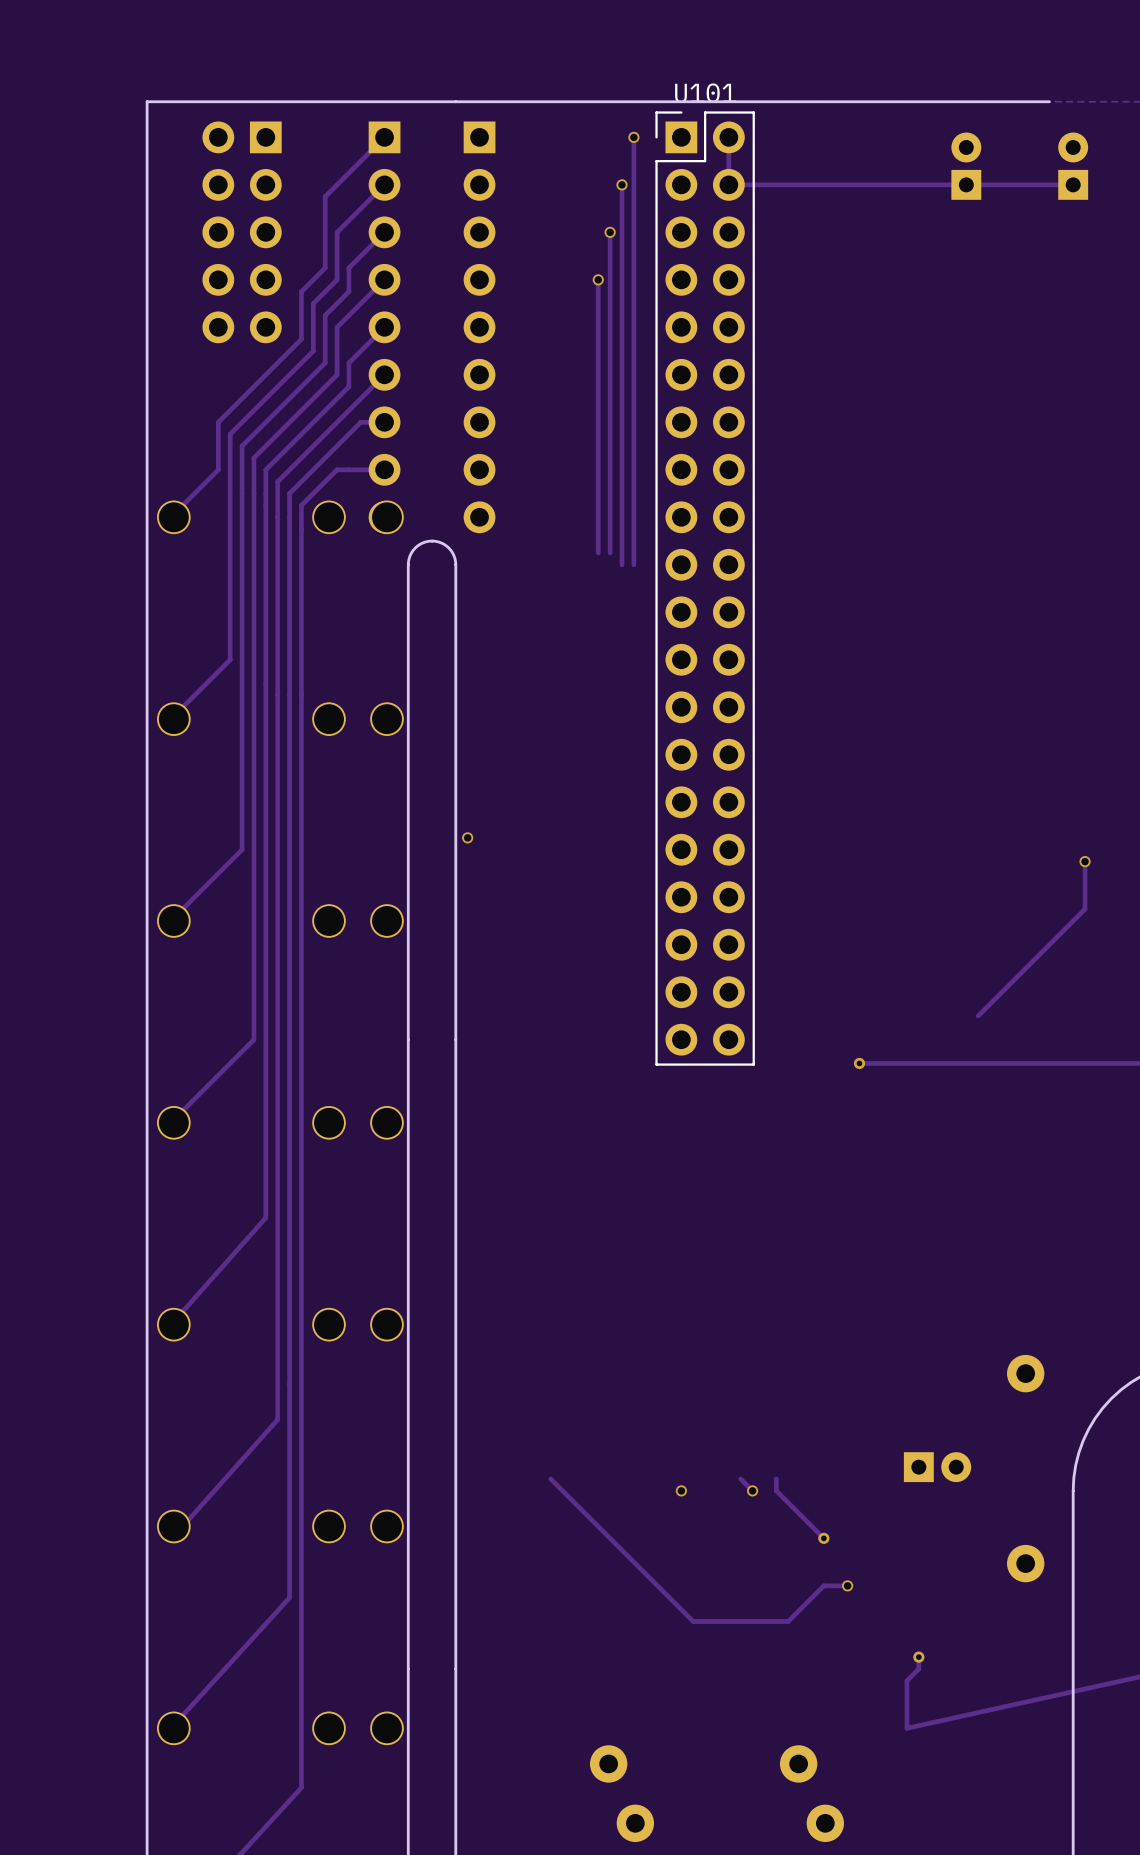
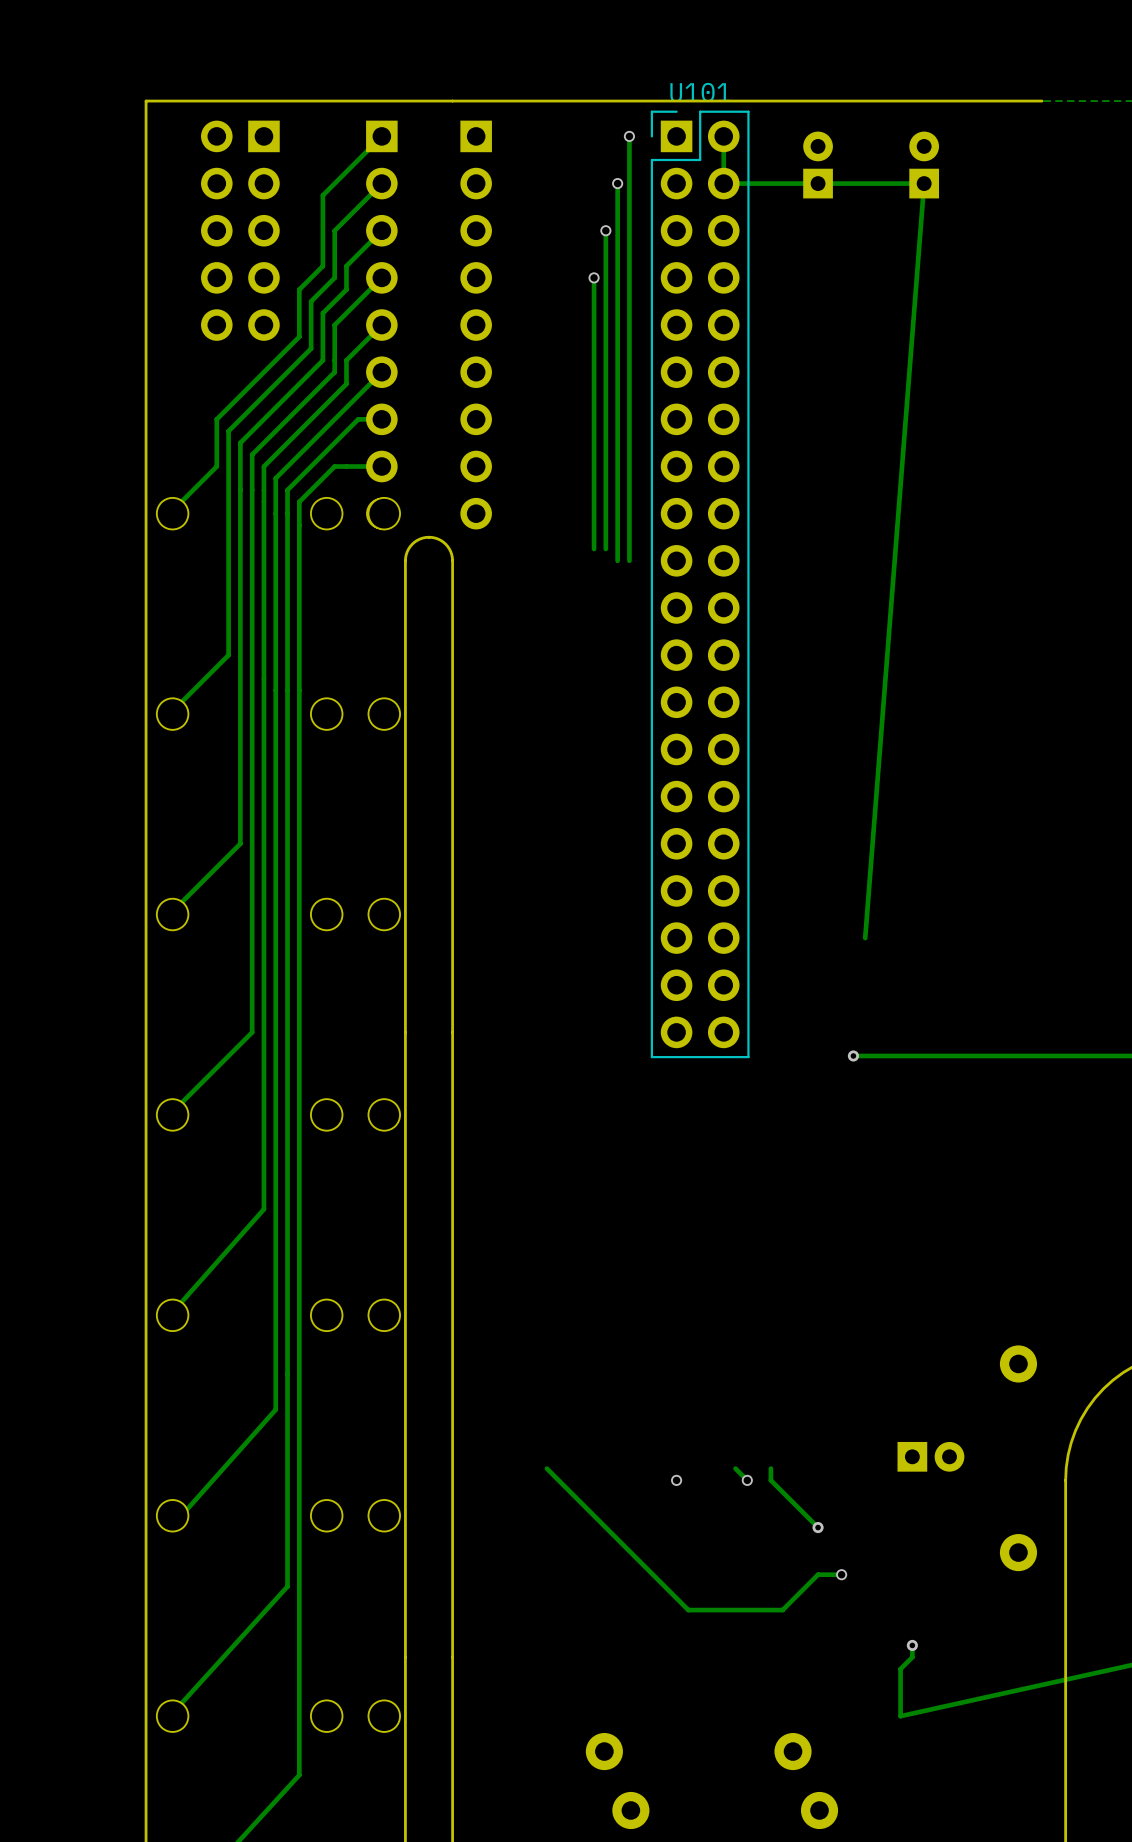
part: none -> (818, 165)
part position: (966, 166) -> (924, 165)
part: (1073, 166) -> none
track: (1073, 184) (930, 184) -> (865, 938) (924, 183)
via: (467, 837) -> none
track: (1085, 861) (1085, 909) (978, 1015) -> none
via: (1085, 861) -> none

